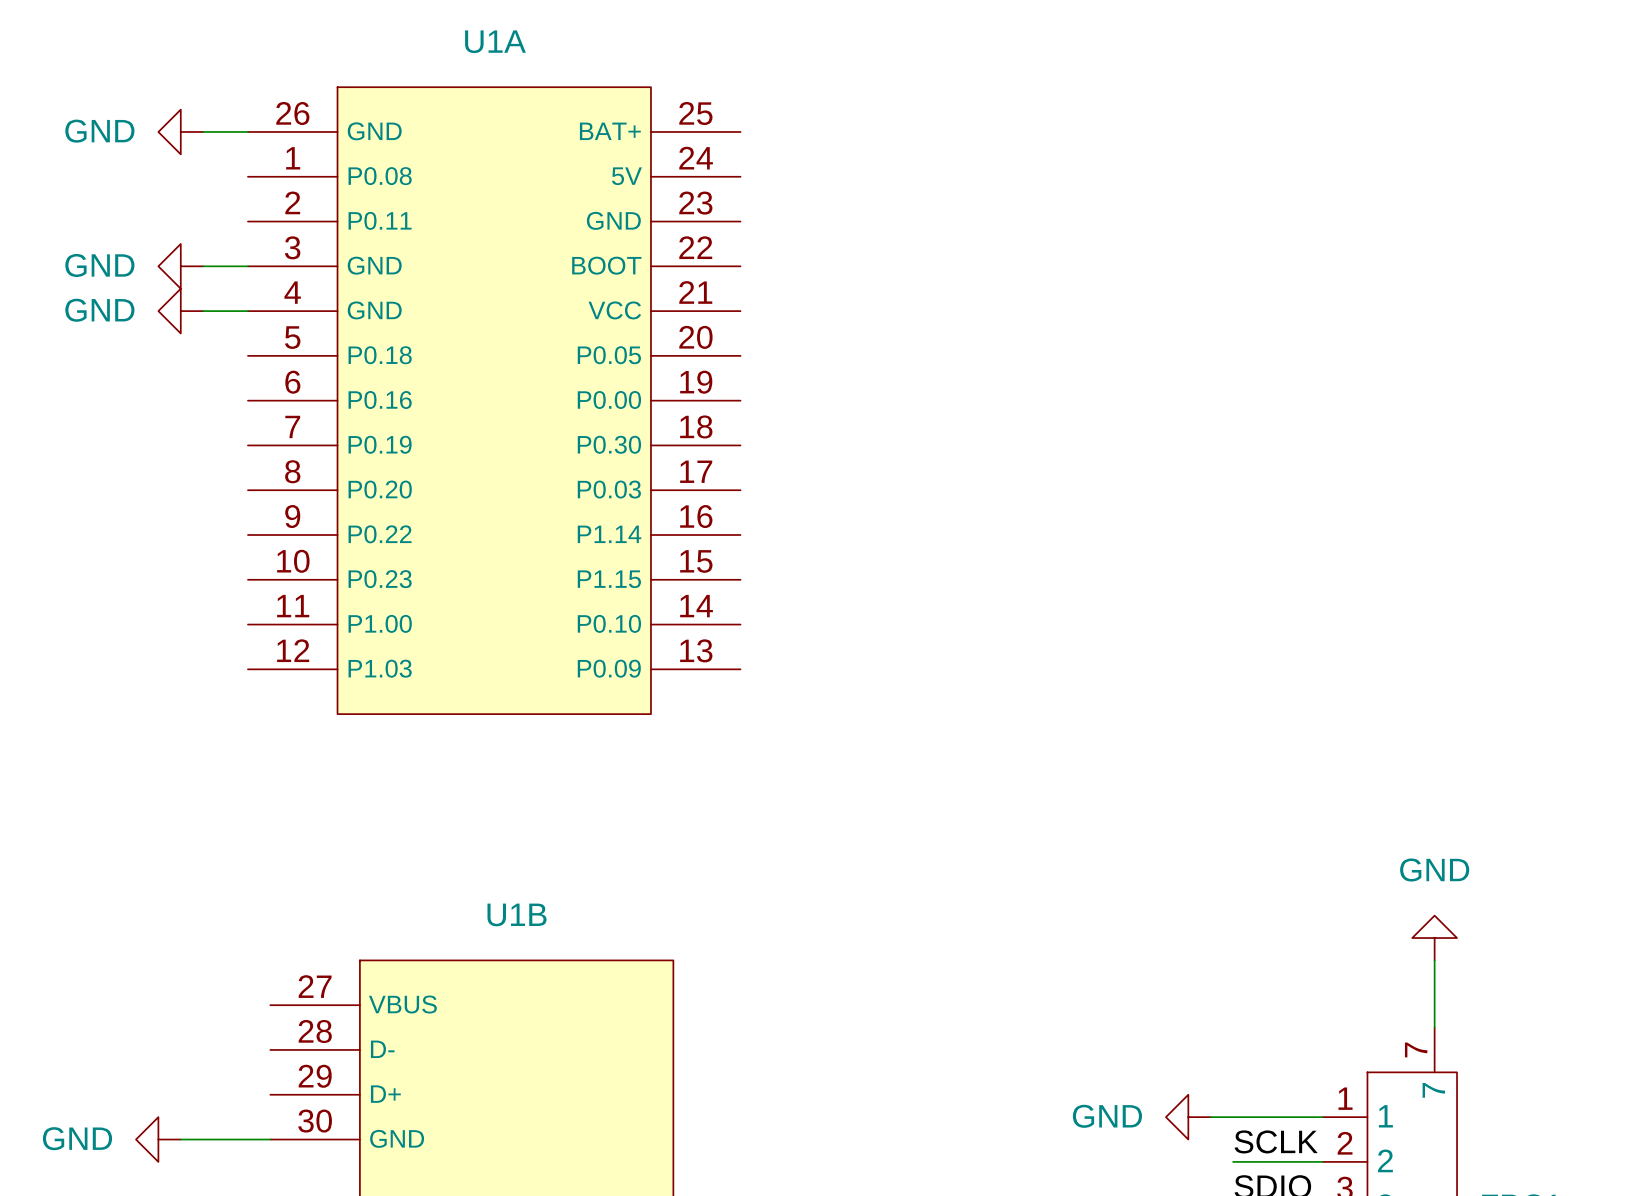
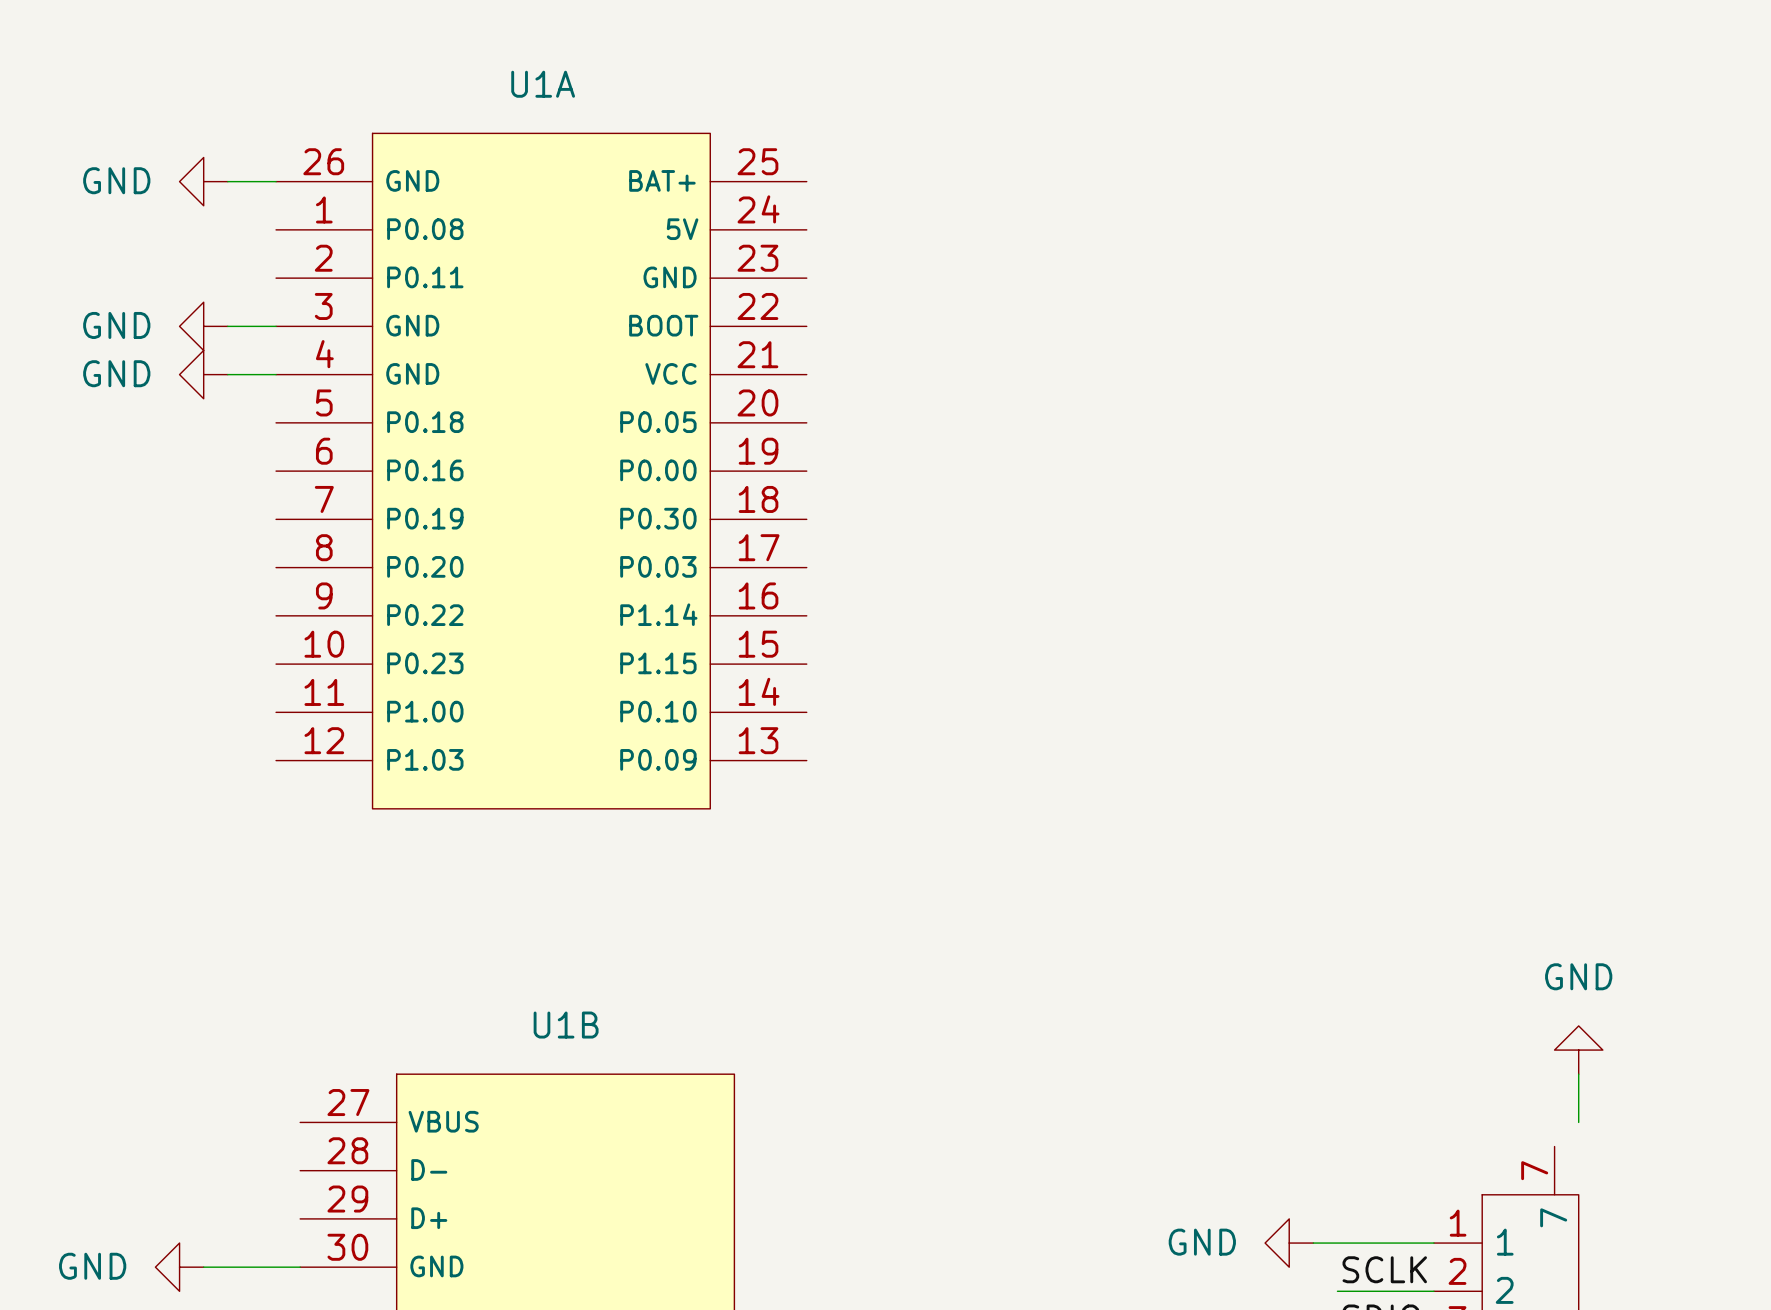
power symbol position: GND (1434, 938) -> GND (1578, 1050)
wire: (1434, 960) (1434, 1027) -> none
wire: none -> (1578, 1074) (1578, 1122)

